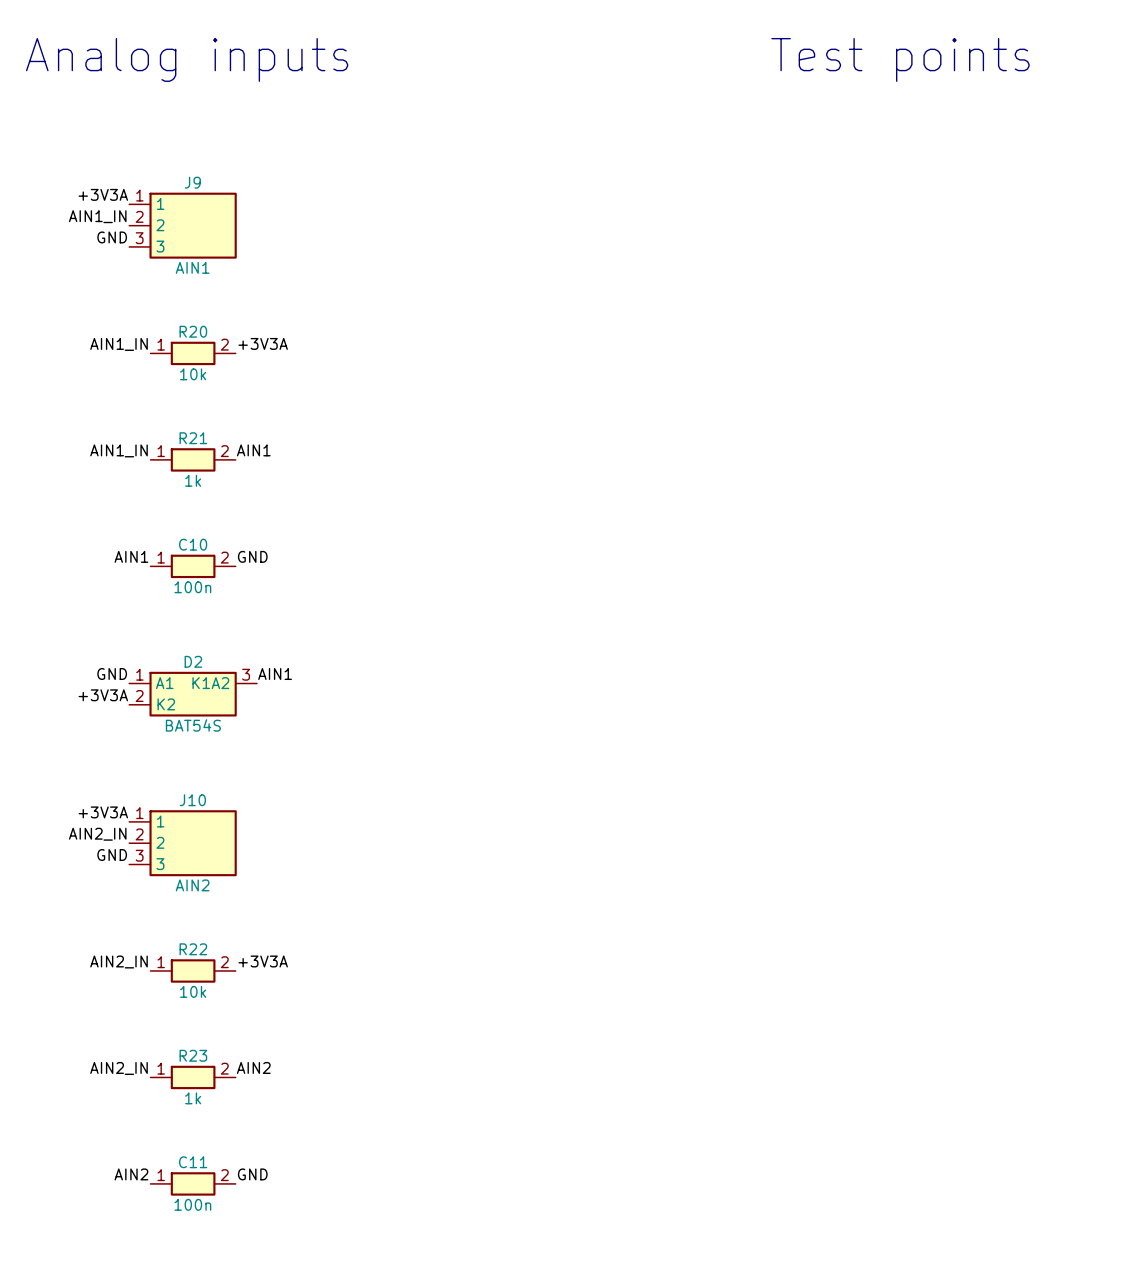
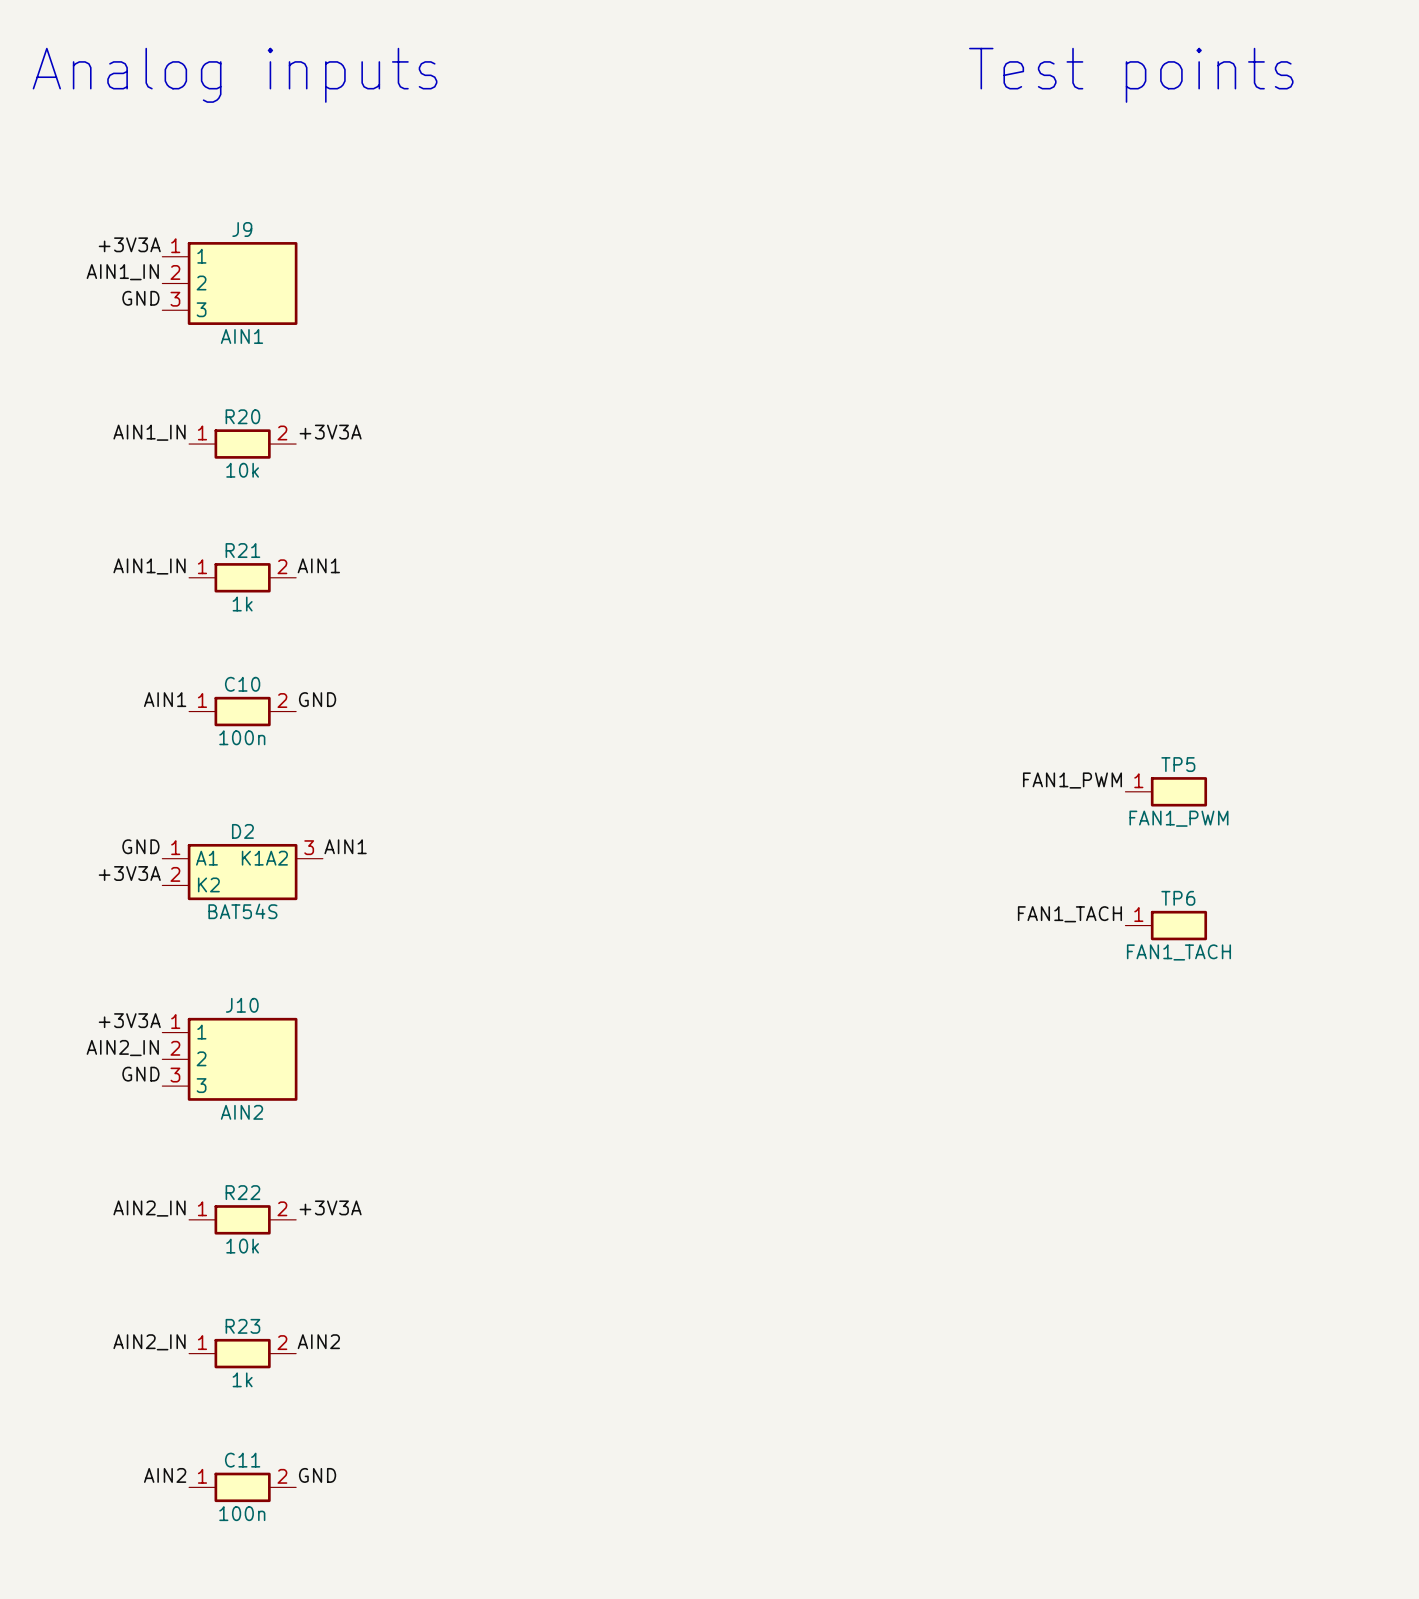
label: none -> FAN1_PWM (1072, 780)
TP5: none -> FAN1_PWM (1166, 791)
label: none -> FAN1_TACH (1069, 914)
TP6: none -> FAN1_TACH (1166, 925)

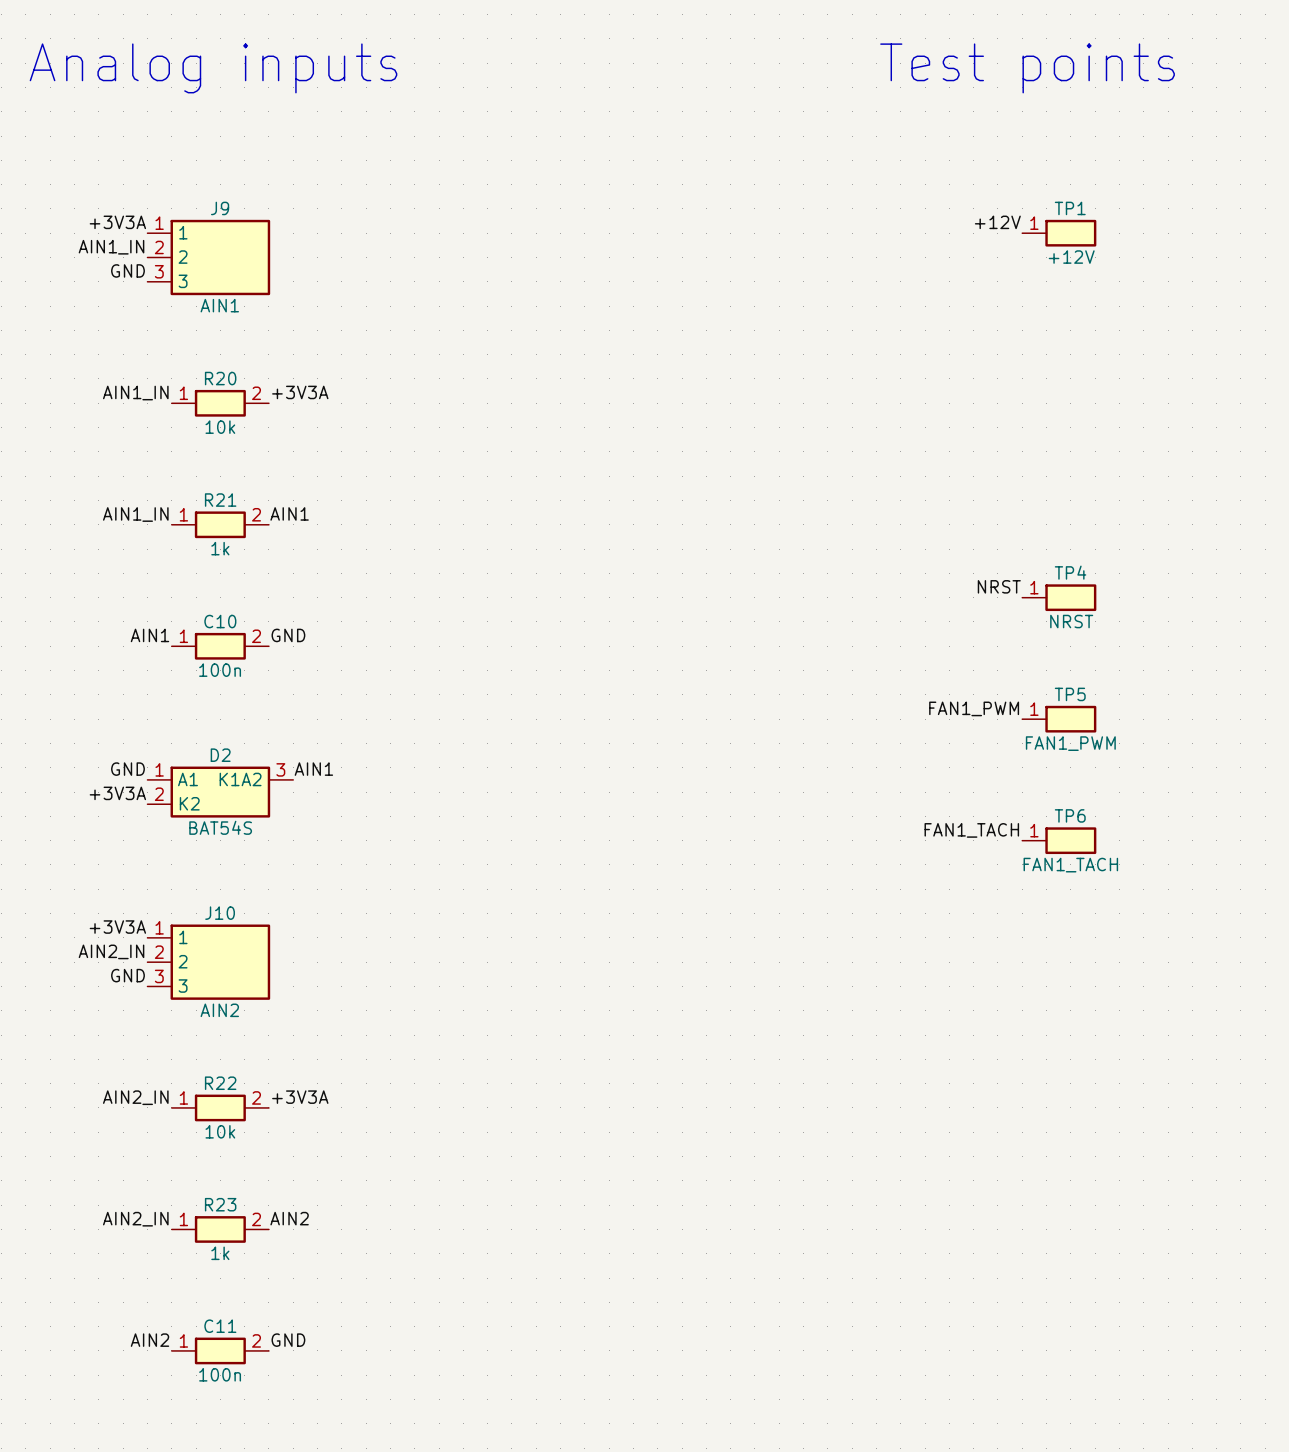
label: none -> +12V (997, 222)
TP1: none -> +12V (1059, 233)
label: none -> NRST (999, 586)
TP4: none -> NRST (1059, 597)

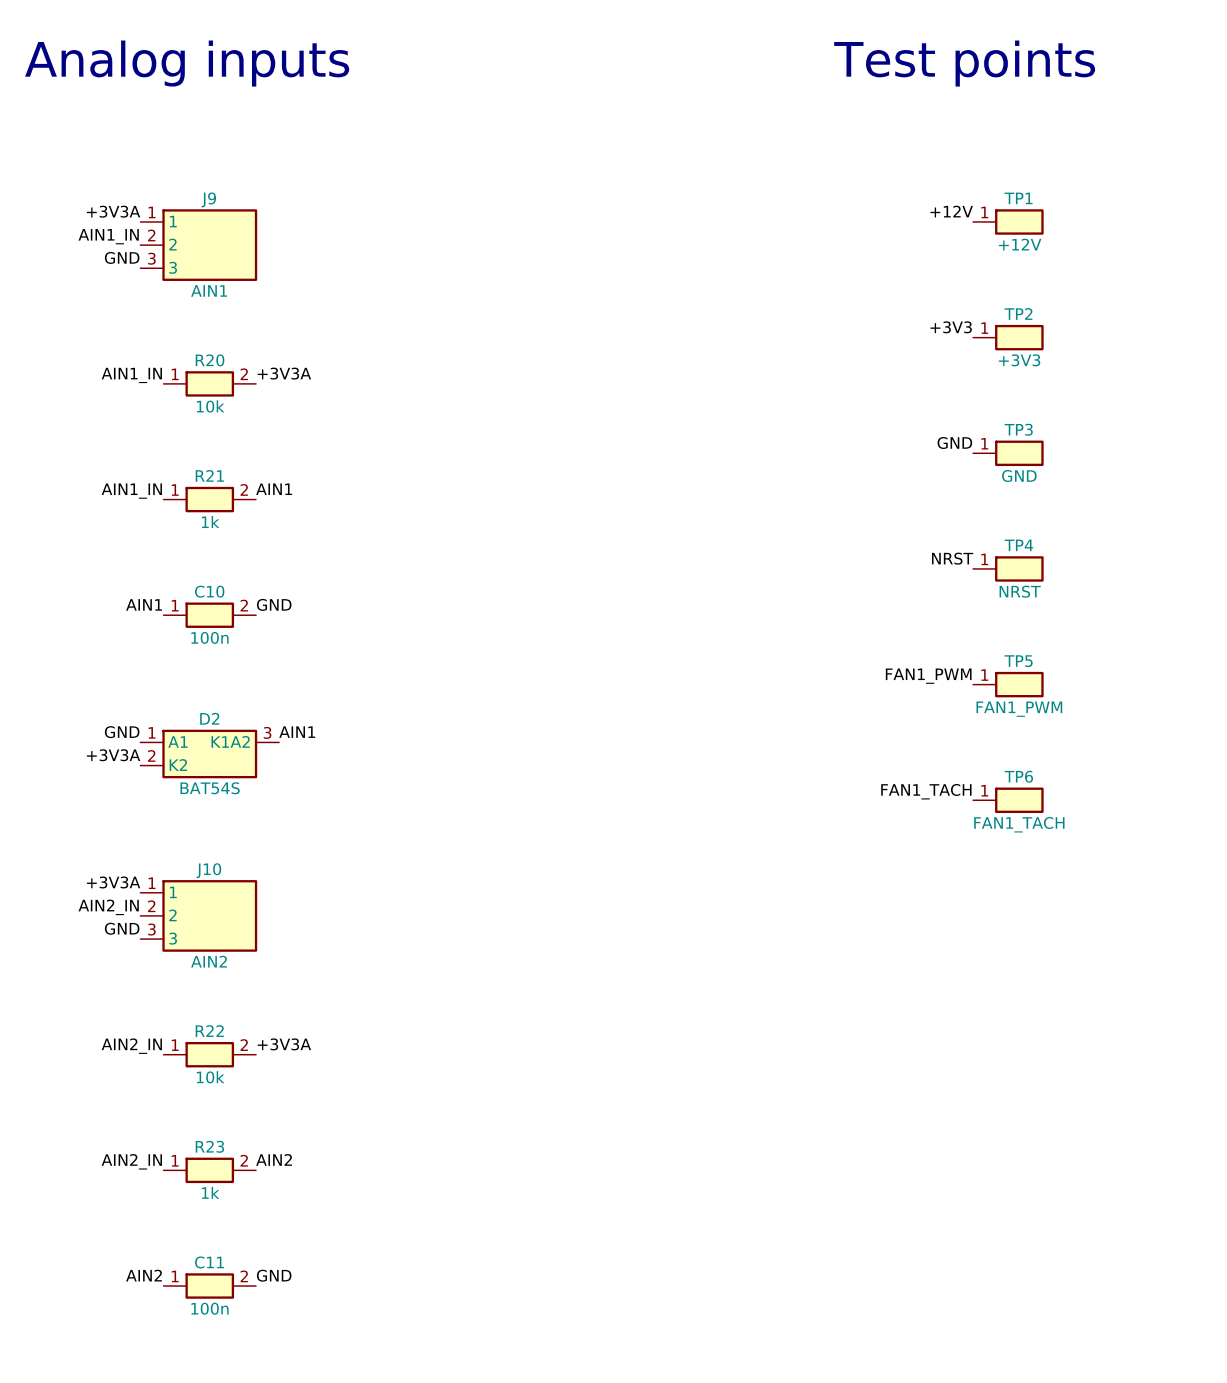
label: none -> +3V3 (951, 327)
TP2: none -> +3V3 (1008, 337)
label: none -> GND (954, 442)
TP3: none -> GND (1008, 453)

